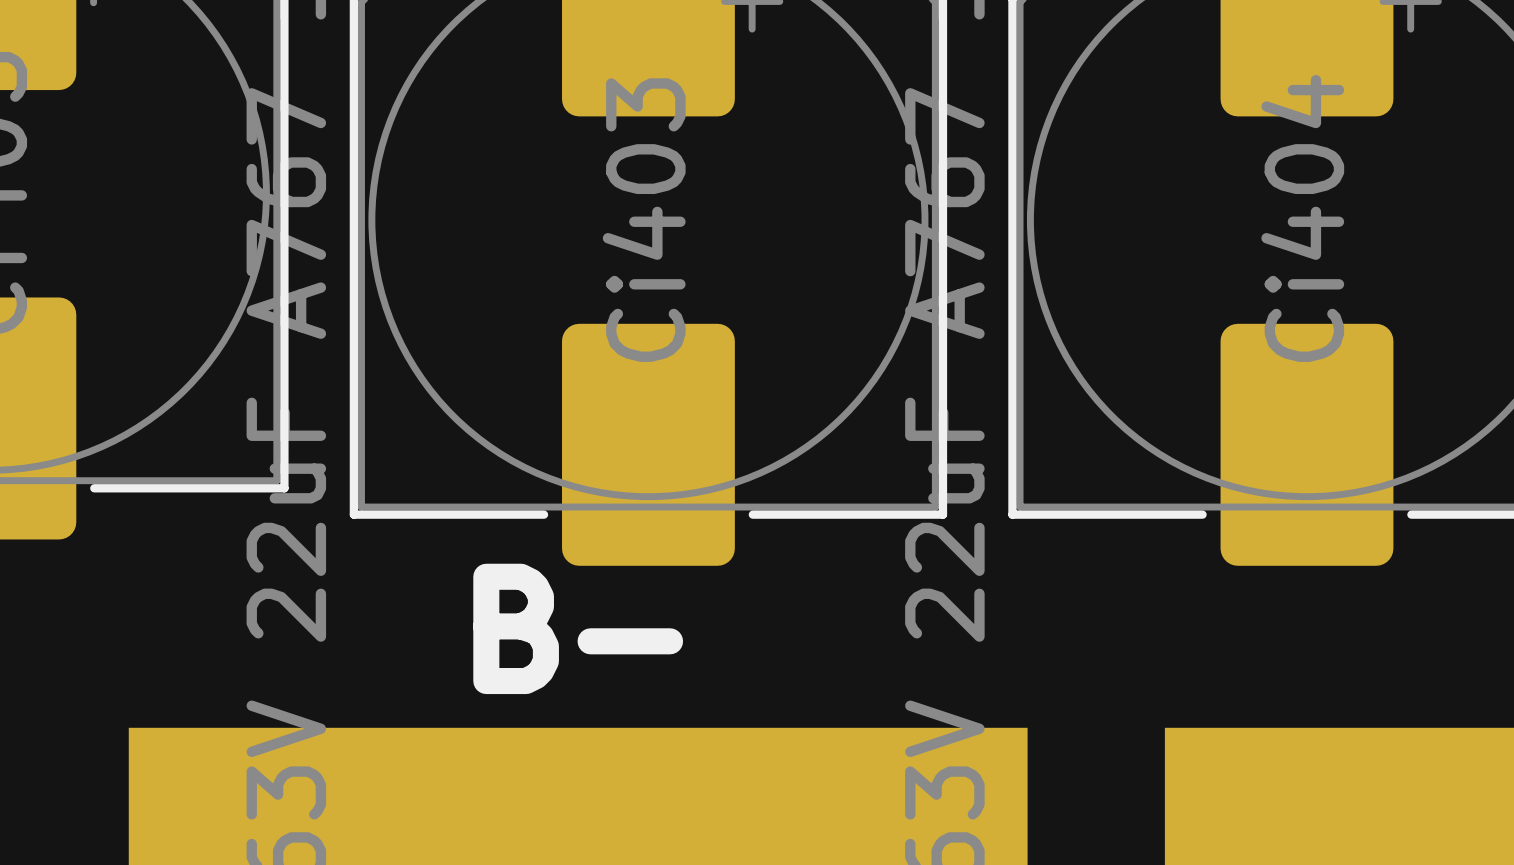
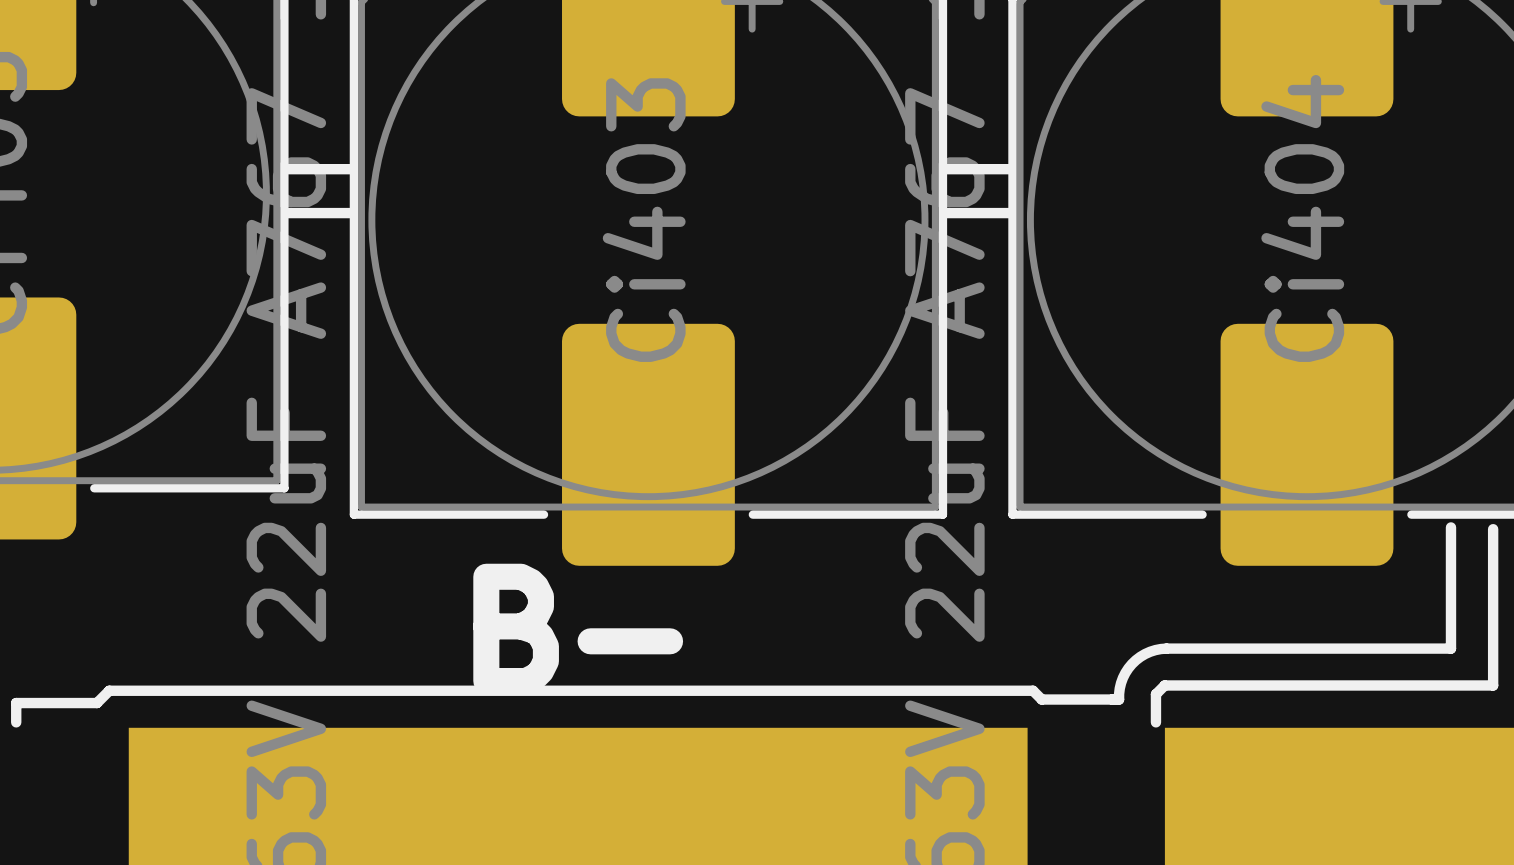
line: none -> (287, 169) (350, 169)
line: none -> (946, 169) (1010, 169)
line: none -> (287, 213) (350, 213)
line: none -> (946, 213) (1010, 213)
line: none -> (1450, 527) (1450, 648) (1160, 649) (1145, 654) (1131, 664) (1122, 677) (1119, 699) (1041, 699) (1033, 690) (109, 690) (97, 703) (16, 703) (16, 722)
line: none -> (1493, 529) (1493, 685) (1164, 685) (1155, 694) (1155, 722)

